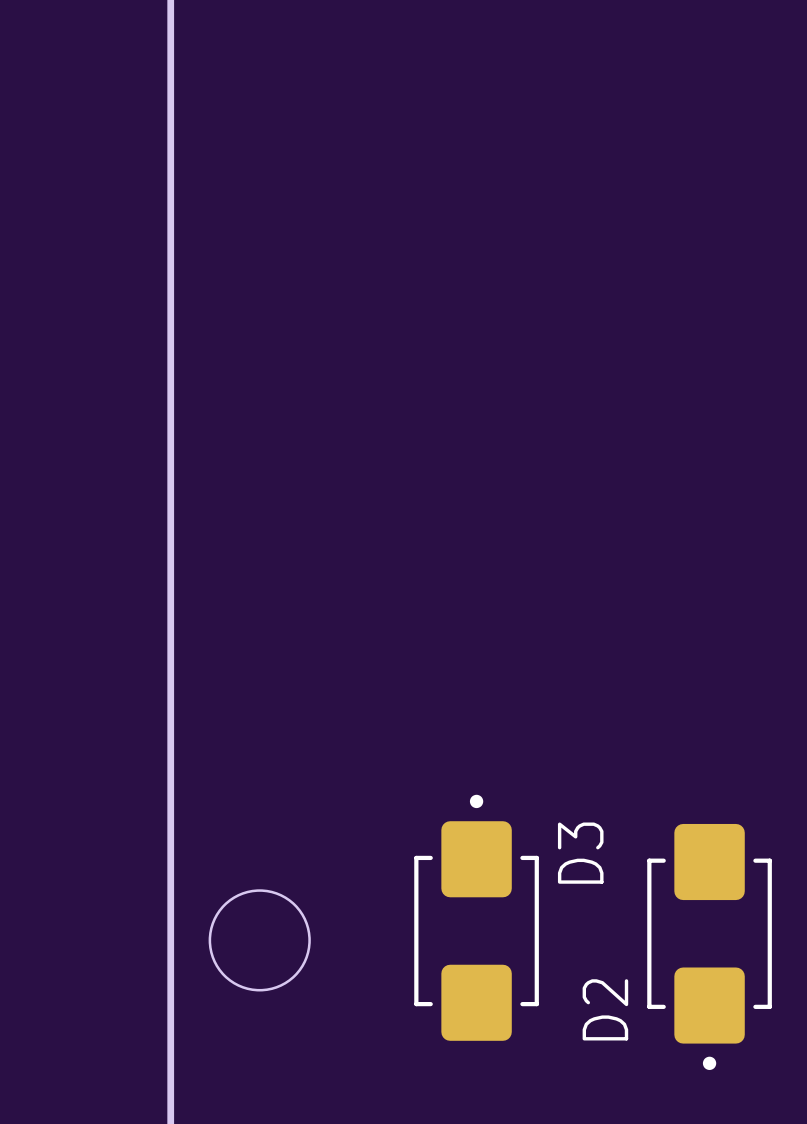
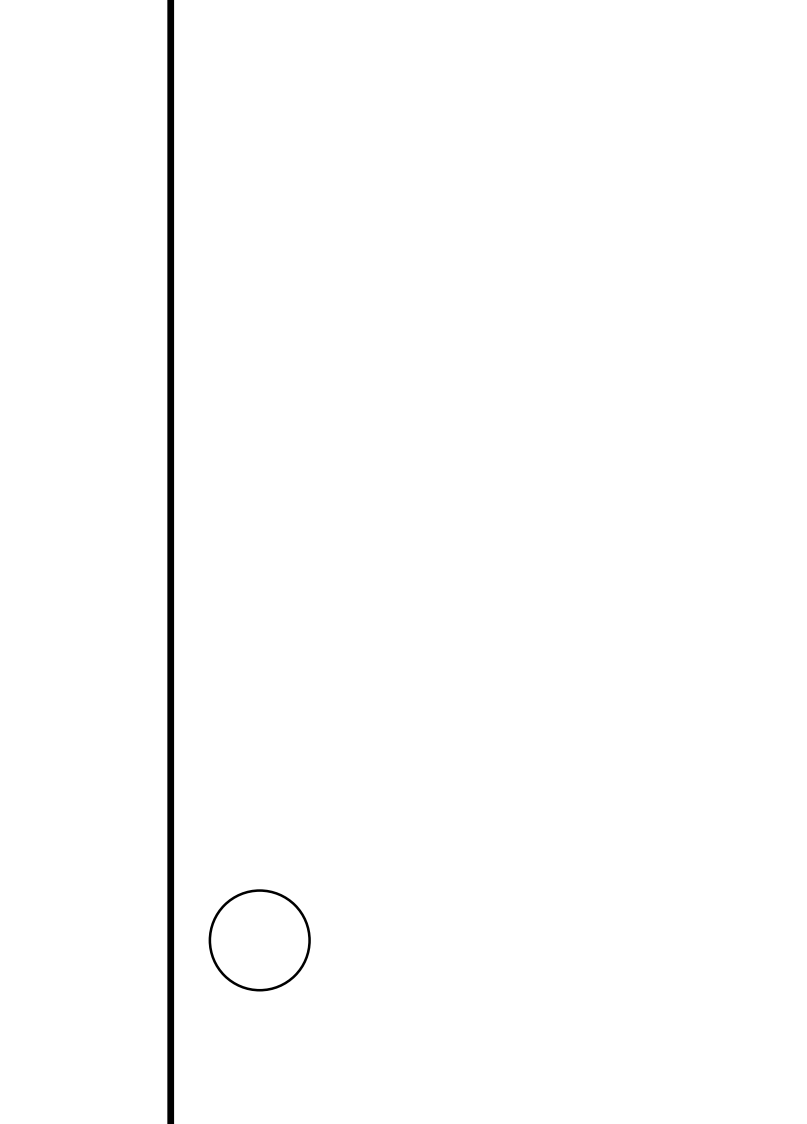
D3: (476, 917) -> none
D2: (709, 946) -> none

